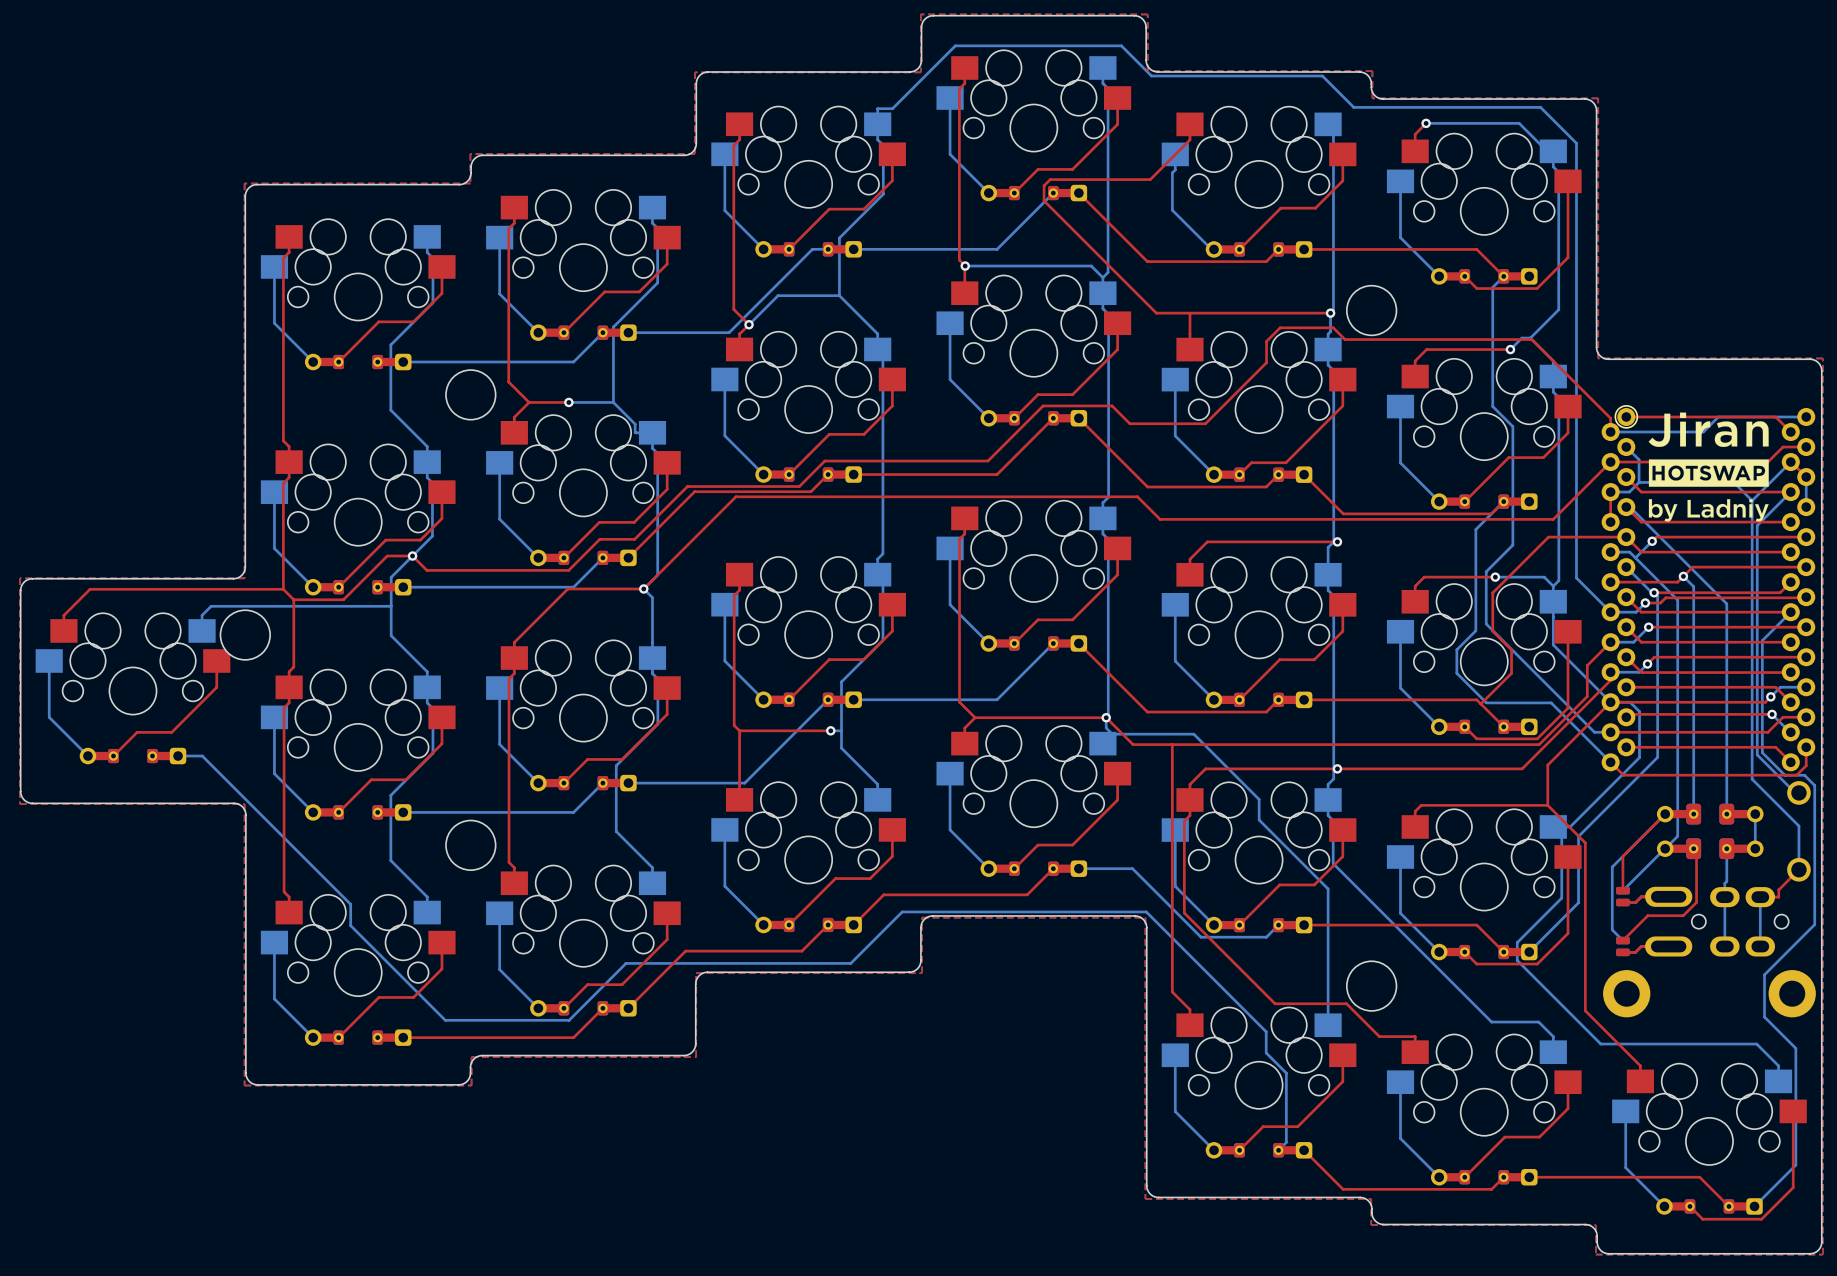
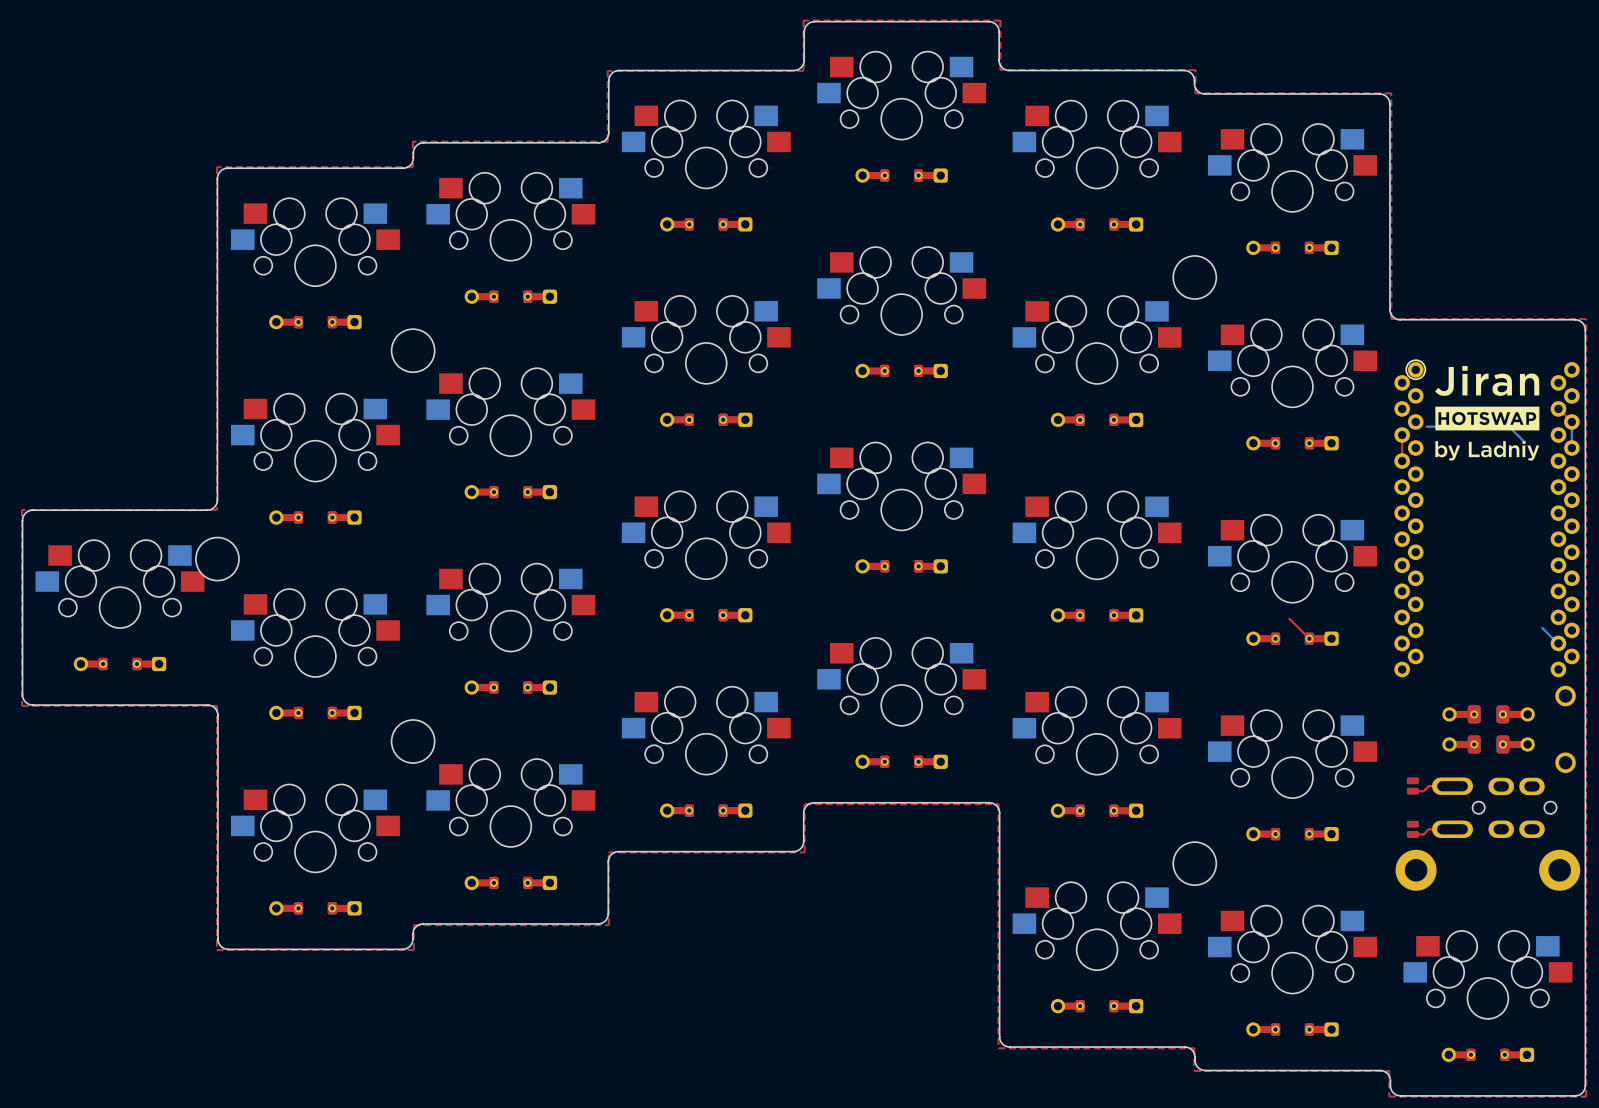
top track: (964, 67) (964, 83) (959, 88) (959, 260) (965, 266) (964, 293) -> none
bottom track: (1102, 67) (1102, 83) (1108, 88) (1108, 272) (1102, 277) -> none
bottom track: (950, 98) (950, 154) (988, 193) -> none
top track: (1117, 98) (1117, 124) (1072, 169) (1037, 169) (1014, 193) (988, 193) -> none
top track: (1426, 123) (1415, 134) (1415, 151) -> none
bottom track: (1426, 123) (1519, 123) (1553, 157) -> none
via: (1426, 123) -> none
top track: (739, 124) (739, 139) (733, 145) (733, 309) (749, 324) (739, 333) (739, 349) -> none
top track: (1189, 124) (1189, 139) (1150, 179) (1050, 179) (1044, 185) (1044, 200) (1156, 313) (1330, 313) -> none
bottom track: (1328, 124) (1328, 130) (1333, 135) (1333, 310) (1330, 313) (1330, 331) (1328, 334) (1328, 365) (1333, 370) (1333, 541) -> none
bottom track: (1553, 151) (1553, 166) (1558, 172) (1558, 309) (1530, 338) -> none
bottom track: (724, 154) (724, 210) (763, 249) -> none
top track: (892, 154) (892, 180) (863, 209) (829, 209) (789, 249) (763, 249) -> none
bottom track: (1175, 154) (1175, 169) (1172, 172) (1172, 210) (1211, 249) (1214, 249) -> none
top track: (1342, 154) (1342, 180) (1315, 208) (1280, 208) (1239, 249) (1214, 249) -> none
bottom track: (1400, 181) (1400, 237) (1439, 276) -> none
top track: (1568, 181) (1568, 257) (1537, 288) (1476, 288) (1464, 276) (1439, 276) -> none
top track: (1053, 193) (1078, 193) (1147, 261) (1266, 261) (1278, 249) (1476, 249) (1503, 276) (1529, 276) -> none
bottom track: (1053, 193) (997, 249) (853, 249) -> none
top track: (514, 207) (514, 223) (508, 228) (508, 382) (529, 402) -> none
bottom track: (652, 207) (652, 223) (657, 228) (657, 282) (613, 327) (613, 402) -> none
top track: (289, 236) (289, 252) (283, 258) (283, 440) (289, 446) (289, 477) (283, 483) (283, 589) -> none
bottom track: (427, 236) (427, 252) (432, 258) (432, 302) (390, 344) (390, 410) (427, 446) (427, 477) (432, 482) (432, 536) (391, 577) (391, 635) (427, 671) (427, 702) (432, 708) (432, 753) (390, 795) (390, 860) (427, 897) (427, 912) -> none
bottom track: (499, 237) (499, 293) (538, 332) -> none
top track: (667, 237) (667, 264) (639, 291) (604, 291) (563, 332) (538, 332) -> none
bottom track: (828, 249) (812, 249) (729, 332) (628, 332) -> none
bottom track: (274, 266) (274, 323) (313, 362) -> none
top track: (441, 266) (441, 293) (413, 321) (378, 321) (338, 362) (313, 362) -> none
bottom track: (965, 266) (1091, 266) (1102, 277) -> none
via: (965, 266) -> none
bottom track: (1503, 276) (1492, 287) (1492, 406) (1512, 426) (1512, 545) (1486, 571) (1486, 624) (1594, 732) (1610, 732) -> none
bottom track: (1102, 277) (1102, 308) (1108, 314) (1108, 497) (1102, 502) (1102, 533) (1108, 539) (1108, 715) (1106, 717) (1106, 728) (1112, 734) -> none
bottom track: (839, 295) (877, 333) (877, 349) -> none
bottom track: (839, 295) (839, 238) (883, 194) (883, 145) (877, 139) (877, 108) (892, 108) (955, 45) (1121, 45) (1151, 76) (1322, 76) (1353, 107) (1540, 107) (1576, 143) (1576, 578) (1610, 612) (1636, 612) (1645, 602) -> none
bottom track: (839, 295) (778, 295) (749, 324) -> none
top track: (1189, 313) (1189, 349) -> none
via: (1330, 313) -> none
bottom track: (950, 323) (950, 379) (988, 418) -> none
top track: (1117, 323) (1117, 349) (1072, 394) (1037, 394) (1014, 418) (988, 418) -> none
via: (749, 324) -> none
bottom track: (602, 332) (573, 362) (403, 362) -> none
bottom track: (1530, 338) (1521, 338) (1510, 349) -> none
bottom track: (1530, 338) (1553, 360) (1553, 392) (1558, 397) (1558, 580) (1553, 586) -> none
bottom track: (877, 341) (882, 346) (882, 553) (877, 559) (877, 574) -> none
top track: (1510, 349) (1426, 349) (1415, 360) (1415, 376) -> none
via: (1510, 349) -> none
bottom track: (724, 379) (724, 435) (763, 474) -> none
top track: (892, 379) (892, 405) (863, 434) (829, 434) (789, 474) (763, 474) -> none
bottom track: (1175, 379) (1175, 435) (1214, 474) -> none
top track: (1342, 379) (1342, 405) (1286, 462) (1251, 462) (1239, 474) (1214, 474) -> none
top track: (529, 402) (514, 417) (514, 432) -> none
top track: (529, 402) (568, 402) -> none
bottom track: (568, 402) (613, 402) -> none
via: (568, 402) -> none
bottom track: (613, 402) (635, 424) (635, 432) (652, 432) (652, 448) (657, 453) (657, 575) (643, 588) (652, 597) (652, 673) (657, 678) (657, 724) (616, 765) (616, 831) (652, 867) (652, 883) -> none
bottom track: (1400, 406) (1400, 462) (1439, 501) -> none
top track: (1568, 406) (1568, 432) (1543, 457) (1508, 457) (1464, 501) (1439, 501) -> none
top track: (1626, 416) (1775, 416) (1790, 432) -> none
bottom track: (1806, 416) (1718, 416) (1703, 432) (1610, 432) -> none
top track: (1610, 432) (1610, 418) (1531, 339) (1345, 339) (1333, 327) (1280, 327) (1266, 341) (1266, 362) (1205, 423) (1129, 423) (1112, 405) (1043, 405) (988, 461) (824, 461) (799, 486) (687, 486) (634, 539) (599, 539) (568, 570) (426, 570) (412, 556) (387, 556) (343, 599) (293, 599) -> none
bottom track: (1626, 447) (1639, 459) (1639, 482) (1629, 492) (1610, 492) -> none
top track: (1806, 447) (1782, 447) (1767, 462) (1610, 462) (1553, 519) (1160, 519) (1137, 496) (735, 496) (643, 588) (567, 588) (514, 642) (514, 673) (509, 678) (509, 862) (514, 867) (514, 883) -> none
bottom track: (499, 462) (499, 519) (538, 557) -> none
top track: (667, 462) (667, 489) (634, 522) (599, 522) (563, 557) (538, 557) -> none
bottom track: (1790, 462) (1752, 500) (1752, 779) (1798, 826) (1798, 869) -> none
top track: (1626, 477) (1641, 492) (1790, 492) -> none
bottom track: (274, 492) (274, 548) (313, 587) -> none
top track: (441, 492) (441, 518) (420, 540) (385, 540) (338, 587) (313, 587) -> none
bottom track: (1790, 492) (1757, 525) (1757, 754) (1795, 792) (1798, 792) -> none
bottom track: (1503, 501) (1475, 529) (1475, 630) (1456, 649) (1456, 673) (1486, 702) (1551, 702) (1610, 762) -> none
top track: (1529, 501) (1503, 501) (1491, 513) (1343, 513) (1304, 474) (1278, 474) (1266, 487) (1147, 487) (1078, 418) (1053, 418) (997, 474) (828, 474) (810, 491) (694, 491) (628, 557) (602, 557) -> none
top track: (1626, 507) (1641, 522) (1790, 522) -> none
bottom track: (1626, 507) (1630, 507) (1726, 603) (1726, 814) -> none
top track: (964, 518) (964, 533) (959, 539) (959, 702) (975, 717) -> none
top track: (1806, 537) (1656, 537) (1652, 541) -> none
bottom track: (1333, 541) (1328, 547) (1328, 590) (1333, 595) (1333, 778) (1328, 784) (1328, 815) (1333, 820) (1333, 863) (1491, 1022) (1538, 1022) (1553, 1036) (1553, 1052) -> none
top track: (1337, 541) (1207, 541) (1189, 559) (1189, 574) -> none
via: (1337, 541) -> none
bottom track: (1652, 541) (1635, 557) -> none
via: (1652, 541) -> none
bottom track: (950, 548) (950, 604) (988, 643) -> none
top track: (1117, 548) (1117, 574) (1072, 619) (1037, 619) (1014, 643) (988, 643) -> none
bottom track: (1610, 552) (1629, 552) (1677, 600) (1677, 836) (1622, 890) -> none
top track: (1790, 552) (1641, 552) (1626, 537) (1548, 537) (1492, 592) (1492, 631) (1511, 649) (1511, 673) (1480, 703) (1476, 699) (1278, 699) (1266, 712) (1147, 712) (1078, 643) (1053, 643) -> none
via: (412, 556) -> none
bottom track: (602, 557) (573, 587) (403, 587) -> none
bottom track: (1626, 567) (1657, 596) (1657, 757) (1578, 836) (1578, 902) (1529, 952) -> none
top track: (1806, 567) (1692, 567) (1677, 582) (1610, 582) -> none
bottom track: (877, 572) (882, 577) (882, 640) (841, 681) (841, 748) (877, 784) (877, 799) -> none
top track: (739, 574) (739, 590) (734, 595) (734, 725) (739, 730) -> none
bottom track: (1683, 576) (1693, 586) (1693, 814) -> none
via: (1683, 576) -> none
top track: (1495, 577) (1424, 577) (1415, 586) (1415, 601) -> none
bottom track: (1495, 577) (1544, 577) (1553, 586) -> none
via: (1495, 577) -> none
top track: (1790, 582) (1780, 592) (1654, 592) -> none
bottom track: (1553, 586) (1553, 644) (1610, 702) (1630, 702) (1639, 711) (1639, 757) (1570, 826) (1553, 826) -> none
via: (643, 588) -> none
top track: (283, 589) (293, 599) -> none
top track: (283, 589) (90, 589) (63, 615) (63, 630) -> none
via: (1654, 592) -> none
top track: (1626, 597) (1641, 612) (1790, 612) -> none
top track: (1806, 597) (1665, 597) (1660, 602) (1645, 602) -> none
top track: (293, 599) (293, 667) (289, 671) (289, 702) (284, 707) (284, 891) (289, 897) (289, 912) -> none
via: (1645, 602) -> none
bottom track: (724, 604) (724, 661) (763, 699) -> none
top track: (892, 604) (892, 631) (863, 659) (829, 659) (789, 699) (763, 699) -> none
bottom track: (1175, 604) (1175, 661) (1214, 699) -> none
top track: (1342, 604) (1342, 631) (1314, 659) (1279, 659) (1239, 699) (1214, 699) -> none
bottom track: (391, 606) (211, 606) (202, 615) (202, 630) -> none
bottom track: (1790, 612) (1762, 640) (1762, 752) (1784, 775) (1804, 775) (1814, 785) (1814, 924) (1764, 974) (1764, 1017) (1795, 1048) (1795, 1165) (1754, 1206) -> none
top track: (1626, 627) (1641, 642) (1790, 642) -> none
top track: (1648, 627) (1806, 627) -> none
bottom track: (1648, 627) (1633, 642) (1610, 642) -> none
via: (1648, 627) -> none
bottom track: (1400, 631) (1400, 688) (1439, 726) -> none
top track: (1568, 631) (1568, 708) (1537, 738) (1476, 738) (1464, 726) (1439, 726) -> none
top track: (1610, 642) (1587, 665) (1587, 696) (1539, 744) (1133, 744) (1106, 717) (975, 717) -> none
bottom track: (1053, 643) (997, 699) (853, 699) -> none
top track: (1626, 657) (1641, 672) (1790, 672) -> none
top track: (1806, 657) (1654, 657) (1647, 663) -> none
bottom track: (49, 660) (49, 717) (87, 756) -> none
top track: (216, 660) (216, 687) (171, 732) (137, 732) (113, 756) (87, 756) -> none
bottom track: (1647, 663) (1639, 672) (1610, 672) -> none
via: (1647, 663) -> none
top track: (1610, 672) (1610, 680) (1522, 768) (1205, 768) (1189, 784) (1189, 815) (1184, 821) (1184, 913) (1275, 1003) (1346, 1003) (1379, 1036) (1415, 1036) (1415, 1052) -> none
top track: (1626, 687) (1775, 687) (1790, 702) -> none
bottom track: (1806, 687) (1780, 687) (1770, 696) -> none
bottom track: (499, 688) (499, 744) (538, 783) -> none
top track: (667, 688) (667, 714) (622, 759) (587, 759) (563, 783) (538, 783) -> none
top track: (1770, 696) (1765, 702) (1610, 702) (1547, 765) (1547, 805) -> none
via: (1770, 696) -> none
bottom track: (828, 699) (744, 783) (628, 783) -> none
top track: (1772, 714) (1629, 714) (1626, 717) -> none
via: (1772, 714) -> none
bottom track: (274, 717) (274, 773) (313, 812) -> none
top track: (441, 717) (441, 743) (405, 779) (371, 779) (338, 812) (313, 812) -> none
top track: (975, 717) (964, 728) (964, 743) -> none
via: (1106, 717) -> none
top track: (1806, 717) (1782, 717) (1767, 732) (1610, 732) -> none
top track: (739, 730) (739, 799) -> none
top track: (739, 730) (830, 730) -> none
bottom track: (830, 730) (841, 730) -> none
via: (830, 730) -> none
bottom track: (1112, 734) (1193, 734) (1259, 799) (1259, 820) (1328, 888) (1328, 1025) -> none
top track: (1172, 744) (1172, 992) (1189, 1009) (1189, 1025) -> none
top track: (1626, 747) (1775, 747) (1790, 762) -> none
top track: (1806, 747) (1806, 765) (1796, 775) (1623, 775) (1610, 762) -> none
bottom track: (178, 756) (202, 756) (350, 904) (350, 925) (445, 1020) (569, 1020) (626, 963) (850, 963) (902, 911) (1146, 911) (1266, 1031) (1266, 1052) (1286, 1073) (1286, 1142) (1278, 1150) -> none
via: (1337, 768) -> none
bottom track: (950, 773) (950, 829) (988, 868) -> none
top track: (1117, 773) (1117, 800) (1072, 845) (1037, 845) (1014, 868) (988, 868) -> none
bottom track: (602, 783) (573, 812) (403, 812) -> none
top track: (1547, 805) (1585, 842) (1585, 1010) (1640, 1065) (1640, 1081) -> none
top track: (1547, 805) (1421, 805) (1415, 811) (1415, 826) -> none
bottom track: (1665, 814) (1612, 867) (1612, 929) (1622, 940) -> none
top track: (1693, 814) (1665, 814) (1622, 856) (1622, 890) -> none
bottom track: (1755, 814) (1755, 848) -> none
bottom track: (1561, 826) (1561, 898) (1517, 942) (1517, 960) (1600, 1044) (1756, 1044) (1778, 1065) (1778, 1081) -> none
bottom track: (724, 829) (724, 886) (763, 924) -> none
top track: (892, 829) (892, 856) (870, 878) (835, 878) (789, 924) (763, 924) -> none
bottom track: (1175, 830) (1175, 886) (1214, 925) -> none
top track: (1342, 830) (1342, 856) (1314, 884) (1279, 884) (1239, 925) (1214, 925) -> none
top track: (1665, 848) (1693, 848) (1696, 851) (1696, 902) (1683, 915) (1647, 915) (1622, 940) -> none
bottom track: (1726, 848) (1724, 946) -> none
bottom track: (1400, 856) (1400, 913) (1439, 952) -> none
top track: (1568, 856) (1568, 933) (1537, 964) (1476, 964) (1464, 952) (1439, 952) -> none
top track: (1078, 868) (1053, 868) (1027, 894) (883, 894) (853, 924) (828, 924) (801, 951) (685, 951) (628, 1008) (602, 1008) (573, 1037) (377, 1037) -> none
bottom track: (1078, 868) (1132, 868) (1201, 937) (1266, 937) (1278, 925) -> none
top track: (1798, 869) (1778, 889) (1778, 897) (1760, 897) -> none
bottom track: (1760, 897) (1760, 946) -> none
bottom track: (499, 913) (499, 969) (538, 1008) -> none
top track: (667, 913) (667, 939) (622, 984) (587, 984) (563, 1008) (538, 1008) -> none
top track: (1278, 925) (1476, 925) (1503, 952) (1529, 952) -> none
bottom track: (274, 942) (274, 998) (313, 1037) -> none
top track: (441, 942) (441, 969) (413, 997) (378, 997) (338, 1037) (313, 1037) -> none
bottom track: (1175, 1055) (1175, 1111) (1214, 1150) -> none
top track: (1342, 1055) (1342, 1081) (1297, 1126) (1263, 1126) (1239, 1150) (1214, 1150) -> none
bottom track: (1400, 1082) (1400, 1138) (1439, 1177) -> none
top track: (1568, 1082) (1568, 1108) (1539, 1137) (1504, 1137) (1464, 1177) (1439, 1177) -> none
bottom track: (1625, 1111) (1625, 1167) (1664, 1206) -> none
top track: (1793, 1111) (1793, 1187) (1761, 1219) (1702, 1219) (1689, 1206) (1664, 1206) -> none
top track: (1278, 1150) (1304, 1150) (1343, 1189) (1491, 1189) (1503, 1177) (1699, 1177) (1728, 1206) (1754, 1206) -> none

